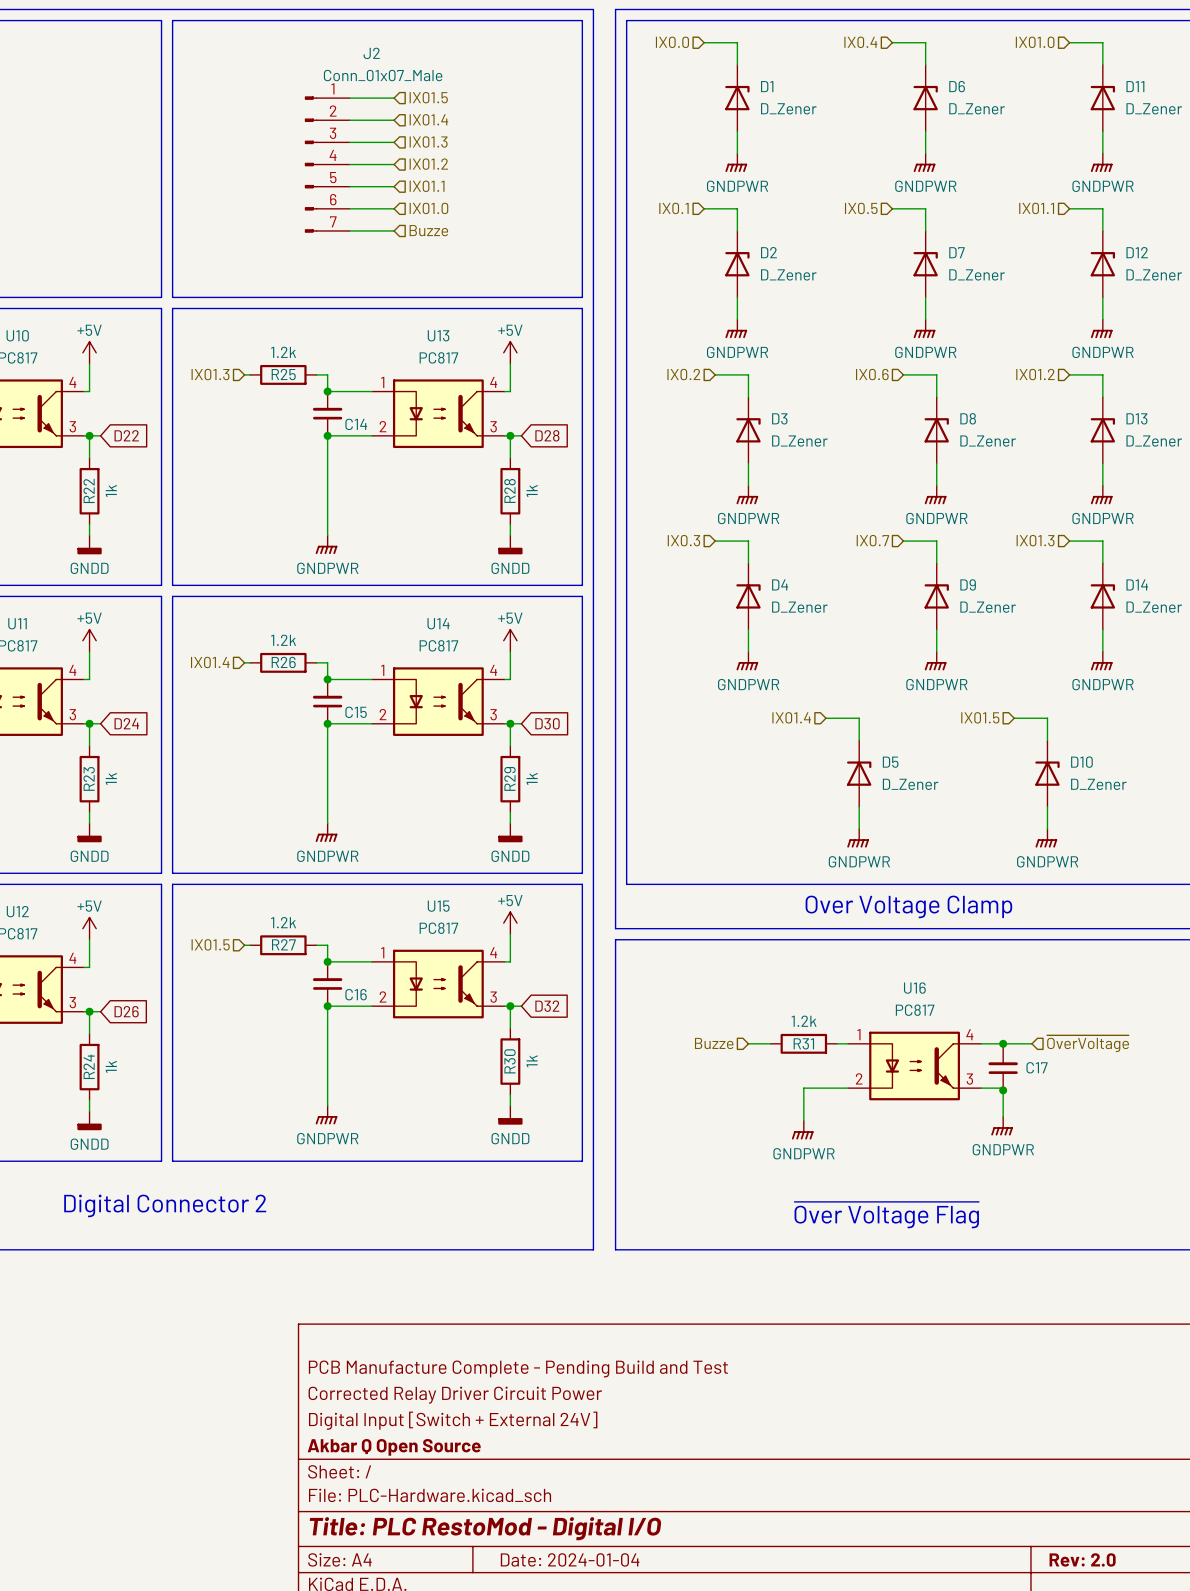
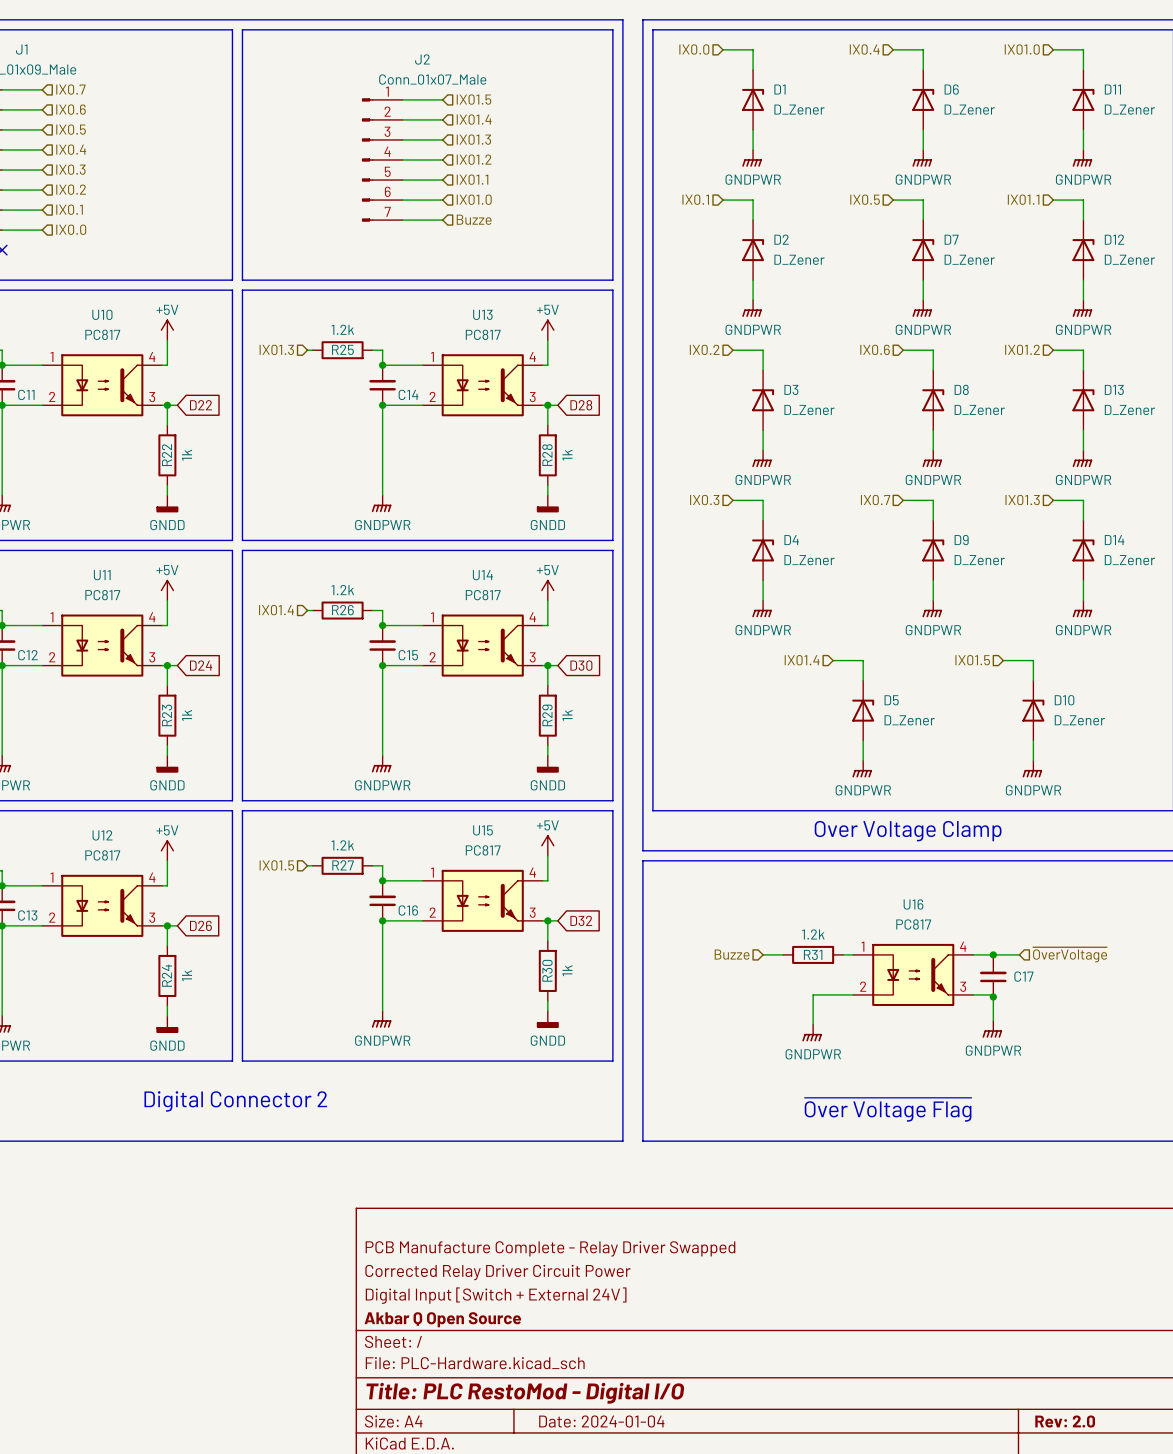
title block: PCB Manufacture Complete - Pending Build and Test (518, 1368) -> PCB Manufacture Complete - Relay Driver Swapped (550, 1248)

